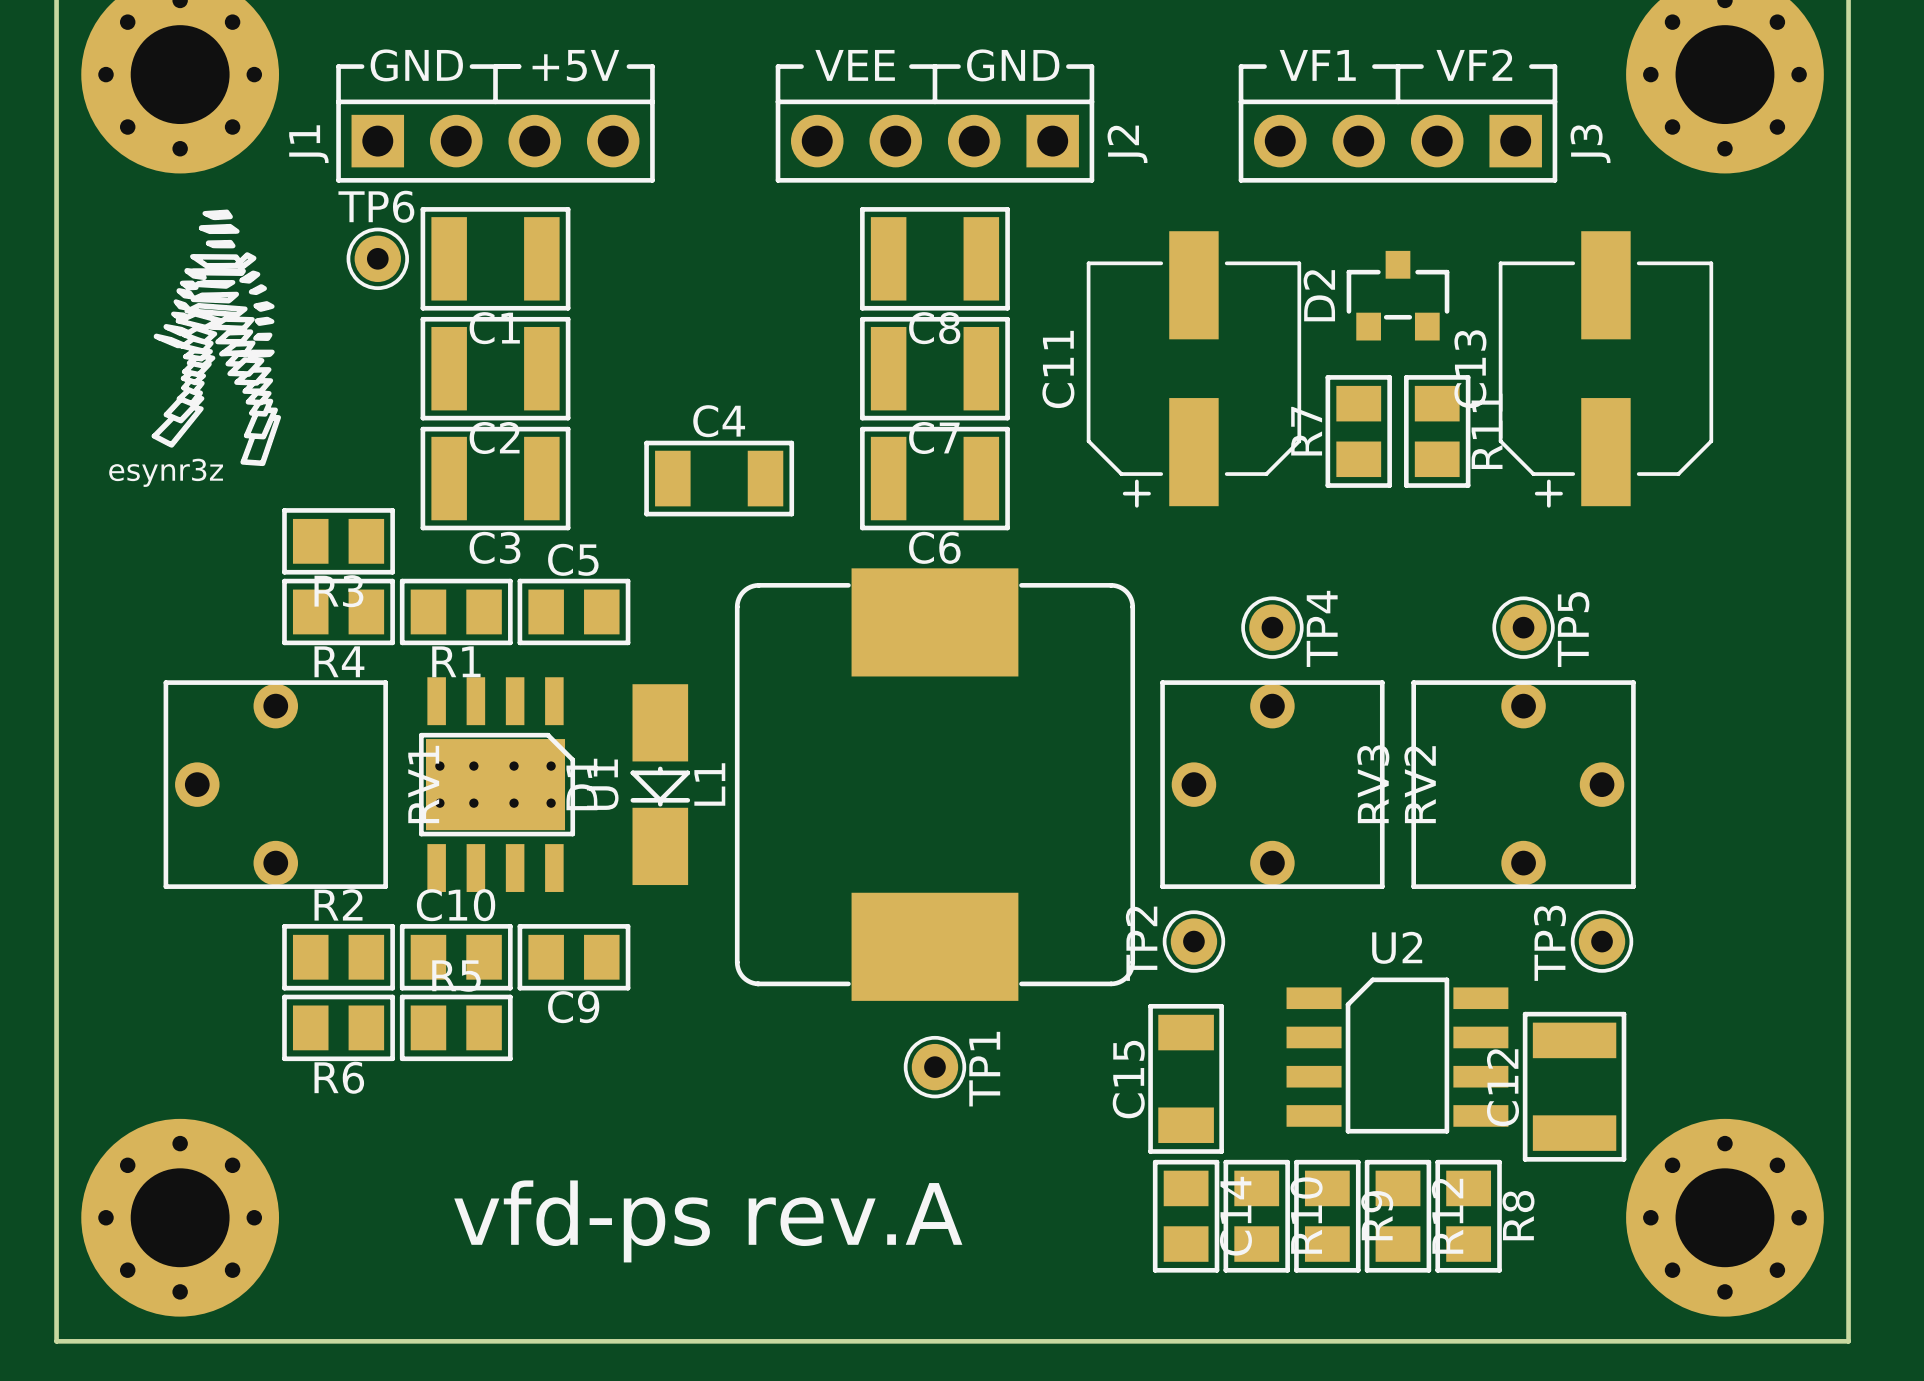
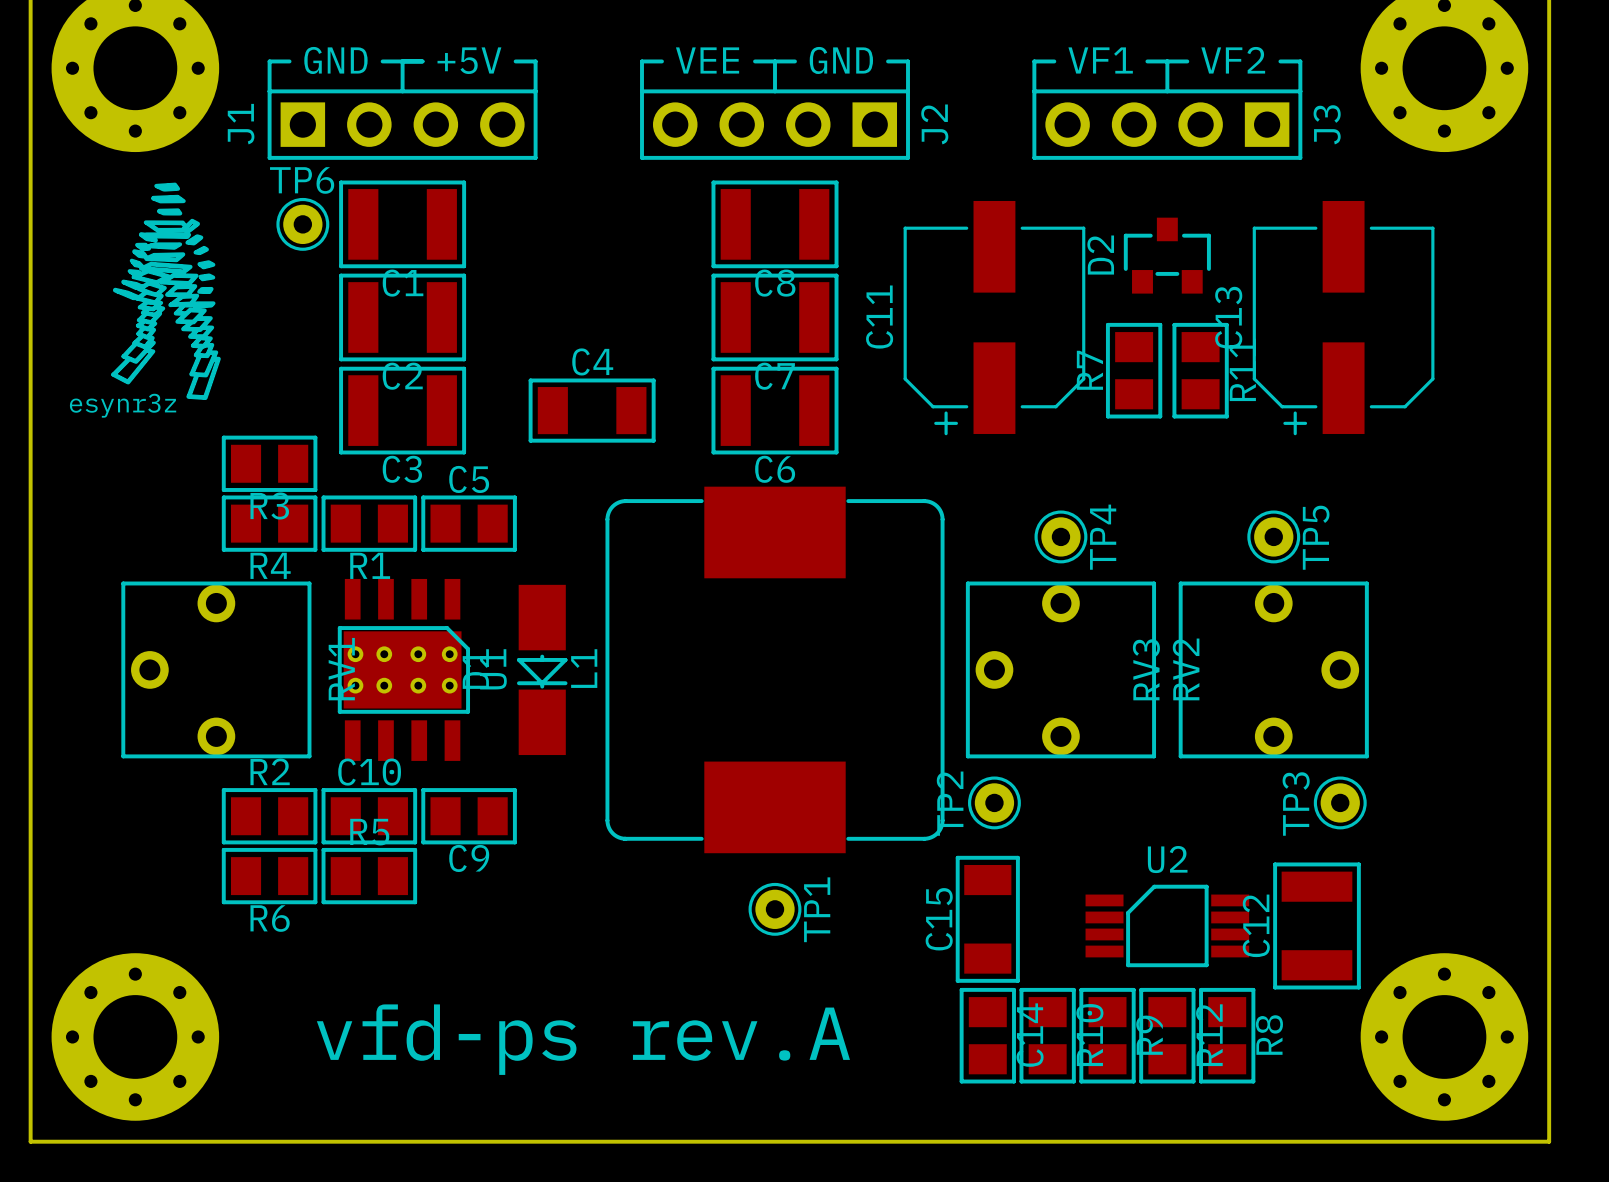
U2 footprint: [1286, 977, 1509, 1134] -> [1085, 884, 1250, 968]

